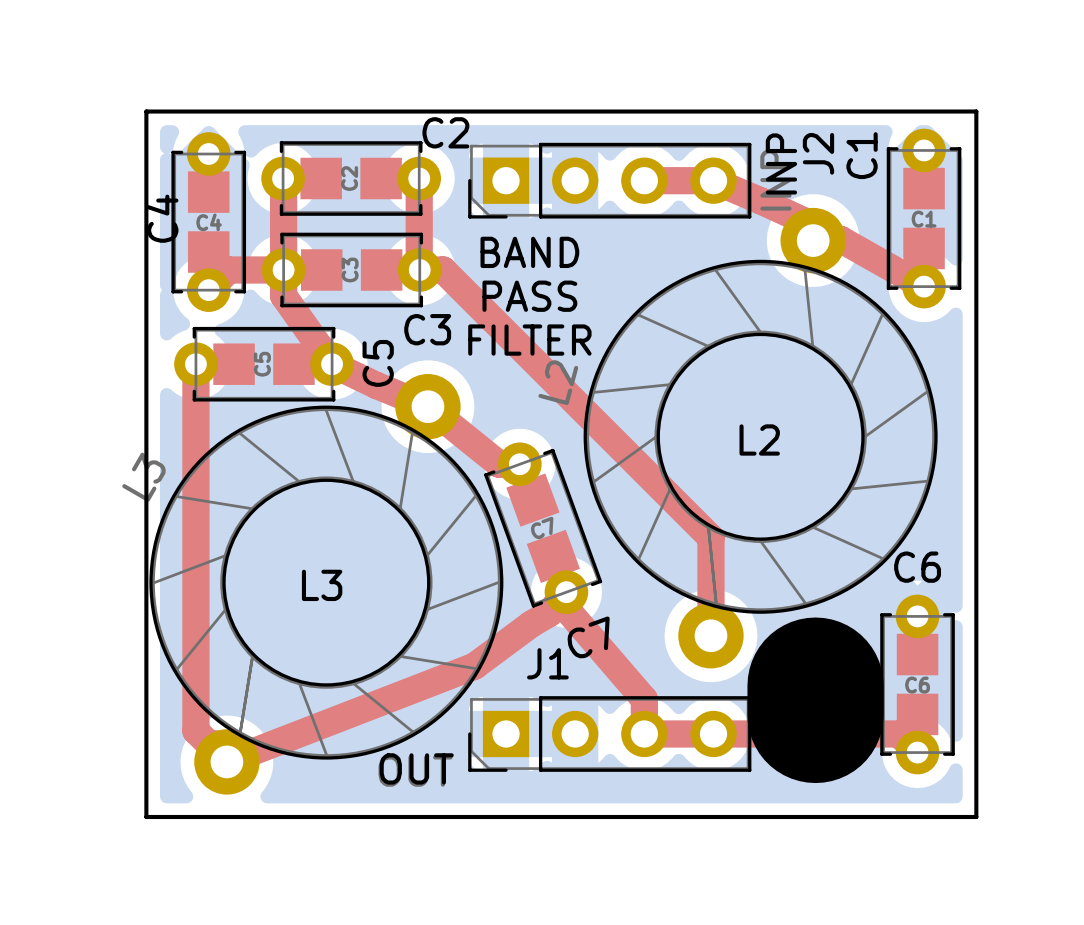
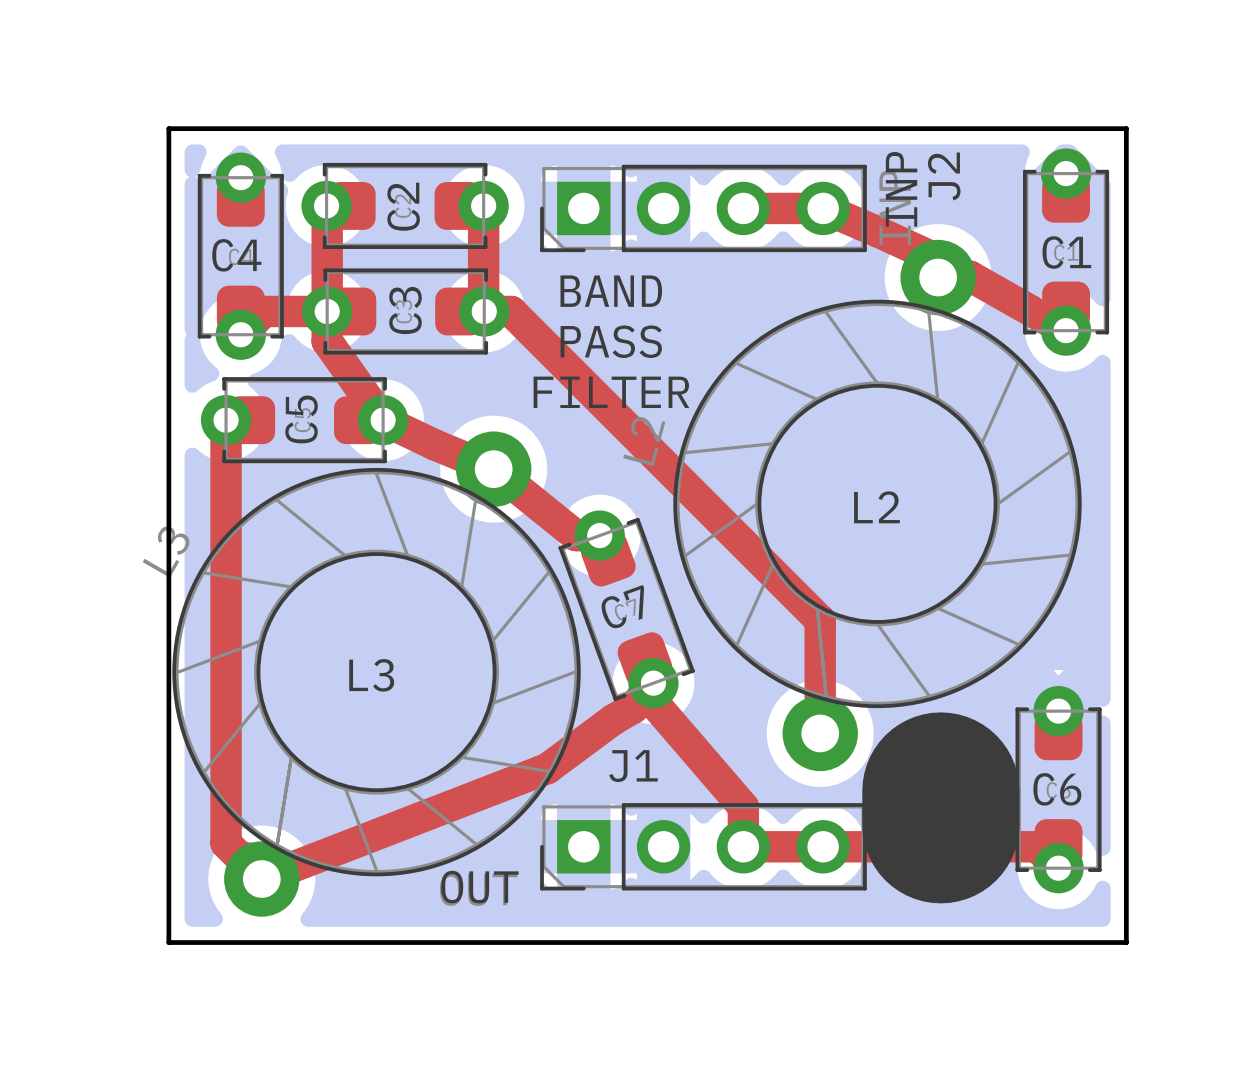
C1 footprint: [886, 128, 962, 309] -> [1023, 148, 1110, 356]
C4 footprint: [171, 132, 247, 312] -> [197, 152, 284, 360]
C2 name position: C2 (445, 132) -> C2 (403, 206)
C2 footprint: [261, 141, 442, 216] -> [301, 162, 509, 249]
C1 name position: C1 (862, 155) -> C1 (1066, 252)
C3 footprint: [261, 232, 442, 308] -> [302, 268, 510, 355]
C5 footprint: [174, 326, 354, 402] -> [200, 377, 409, 464]
C3 name position: C3 (427, 329) -> C3 (405, 310)
C5 name position: C5 (378, 363) -> C5 (301, 419)
C7 footprint: [484, 442, 603, 614] -> [558, 510, 695, 709]
C6 name position: C6 (917, 567) -> C6 (1057, 789)
C6 footprint: [880, 594, 955, 775] -> [1015, 686, 1102, 894]
C7 name position: C7 (588, 637) -> C7 (622, 607)

